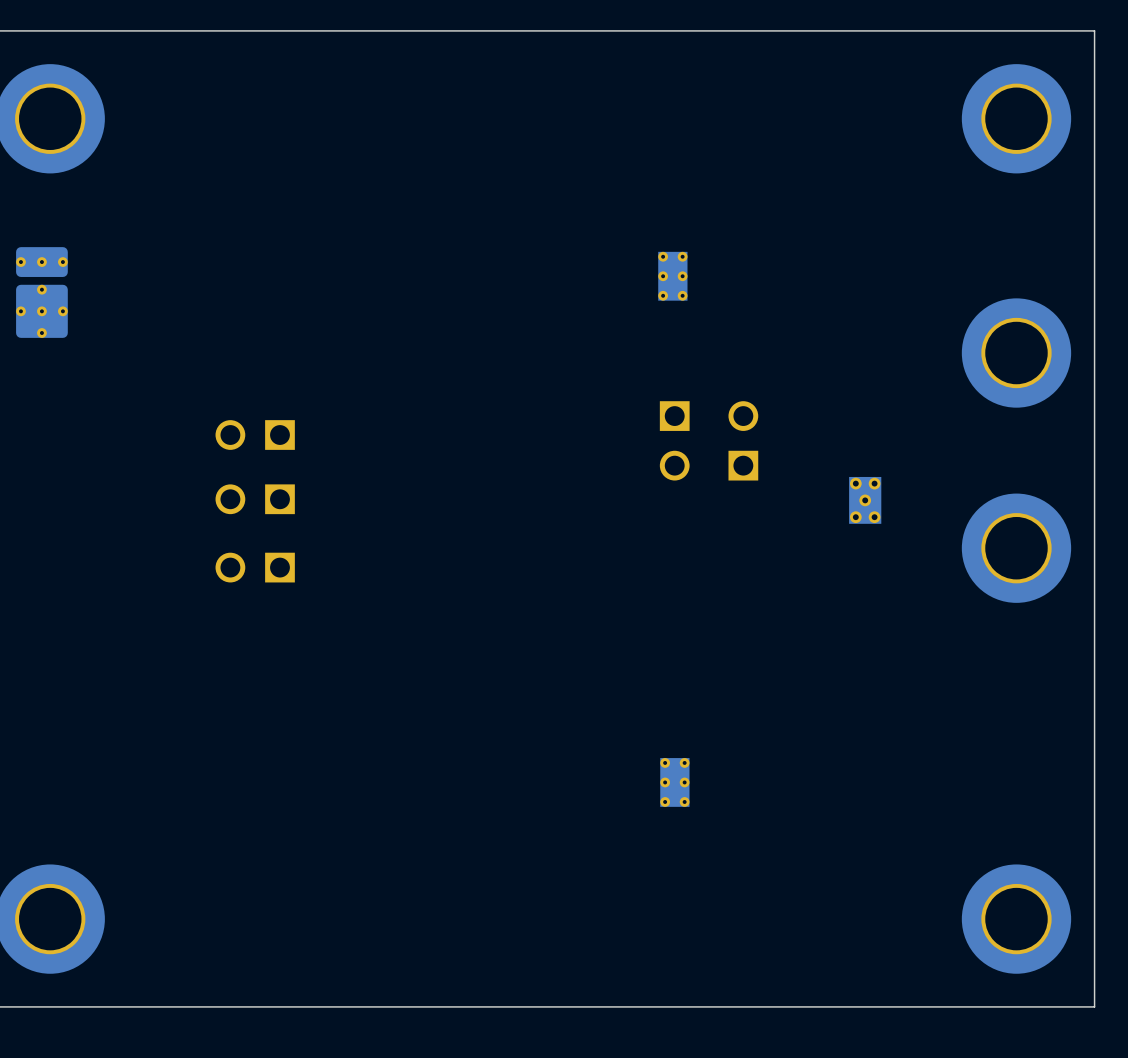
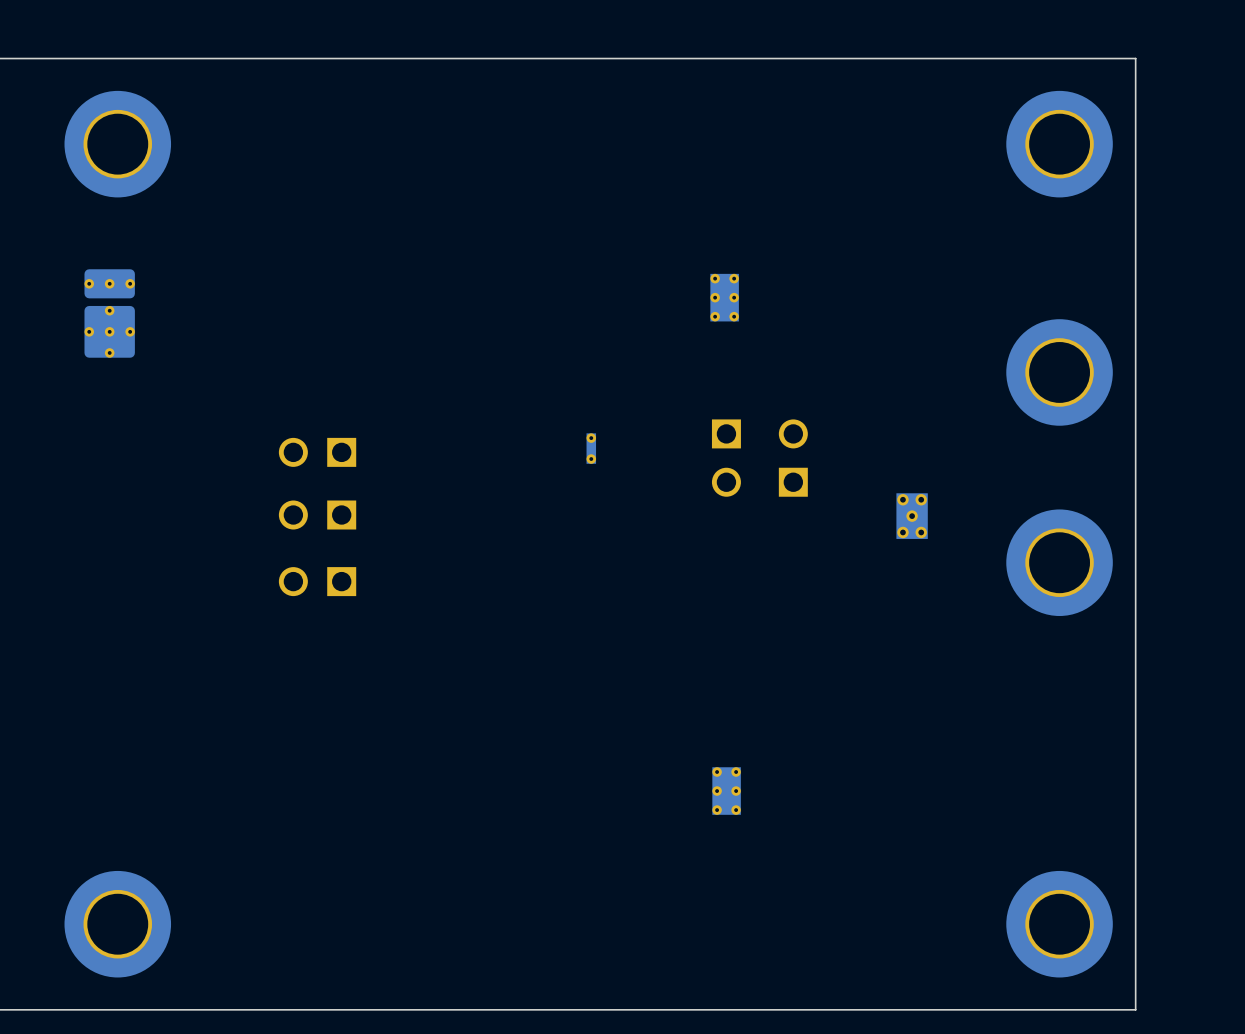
part: none -> (591, 448)

